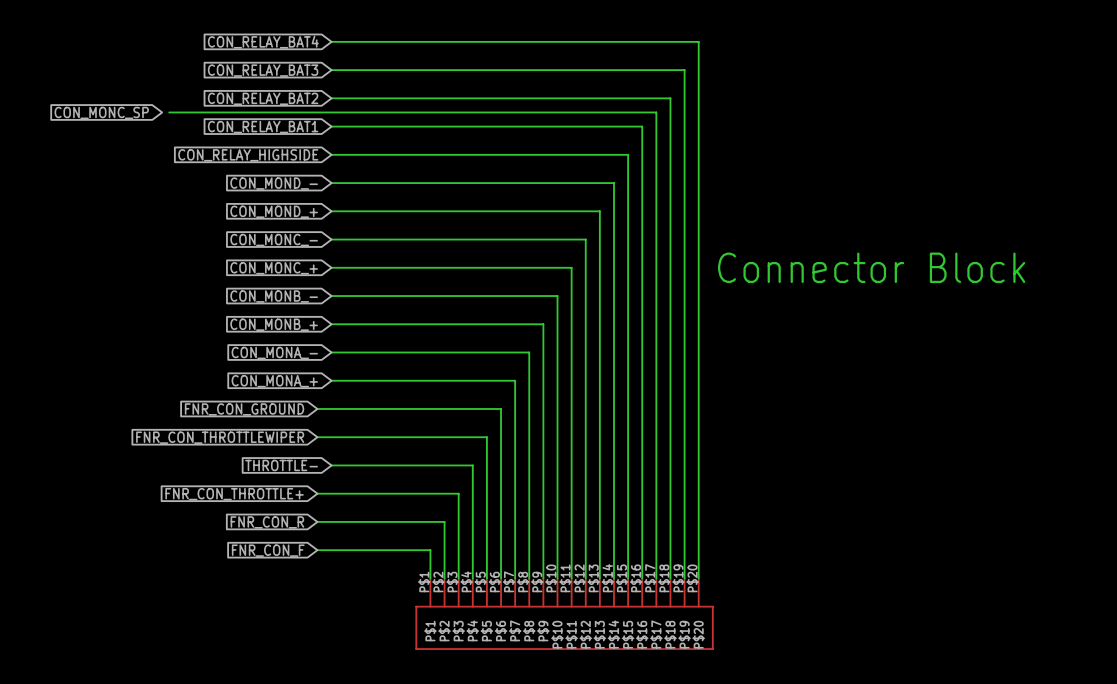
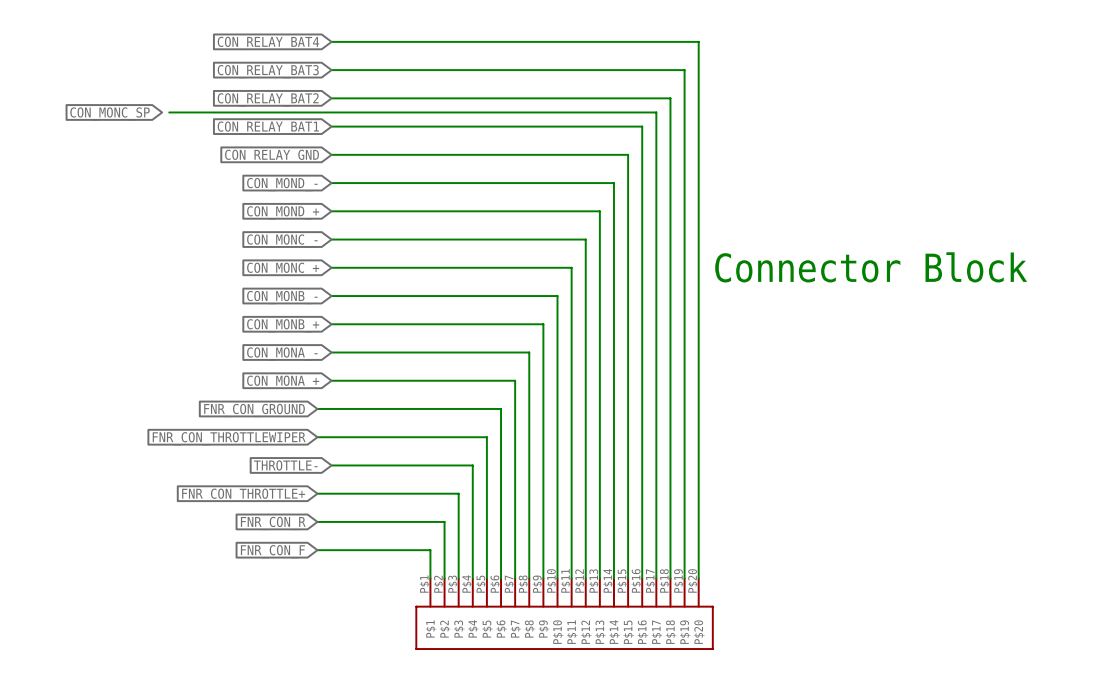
global label: CON_RELAY_HIGHSIDE (248, 155) -> CON_RELAY_GND (272, 156)

